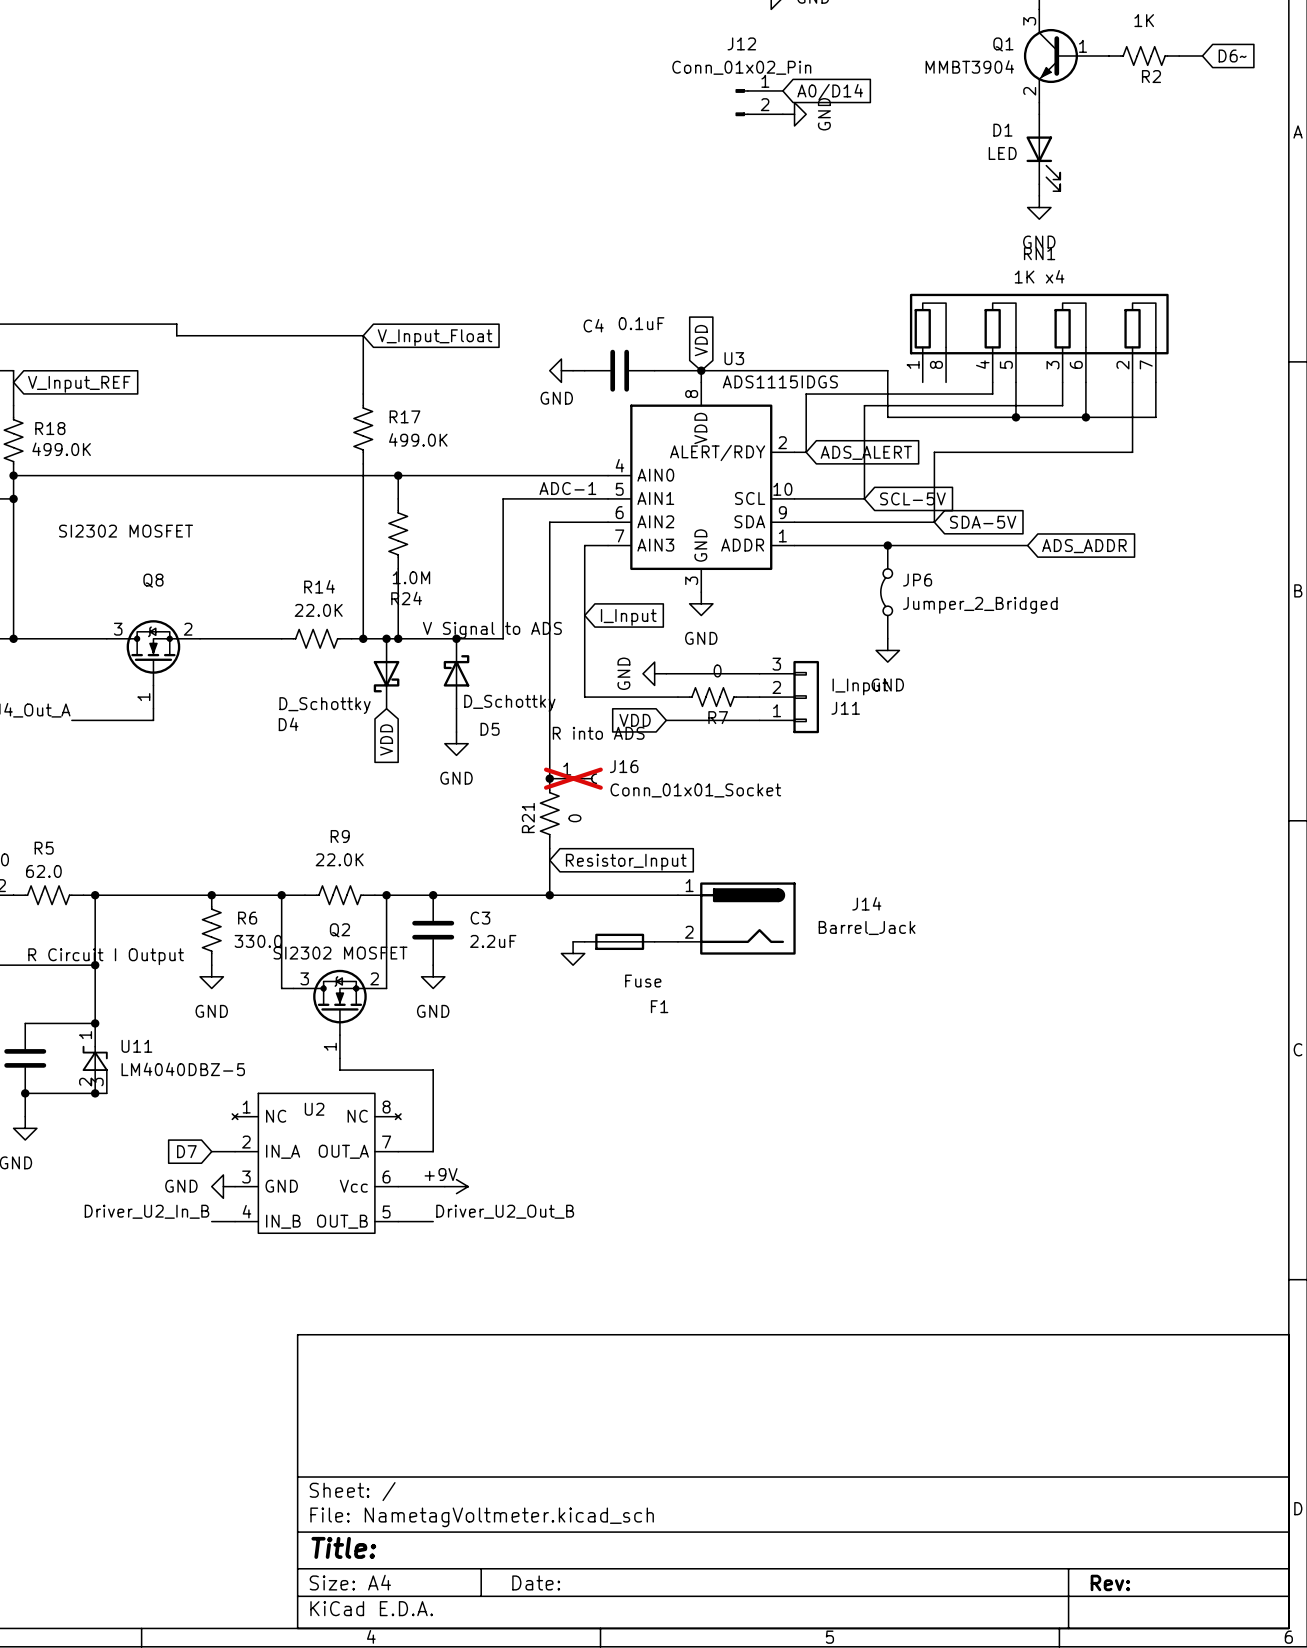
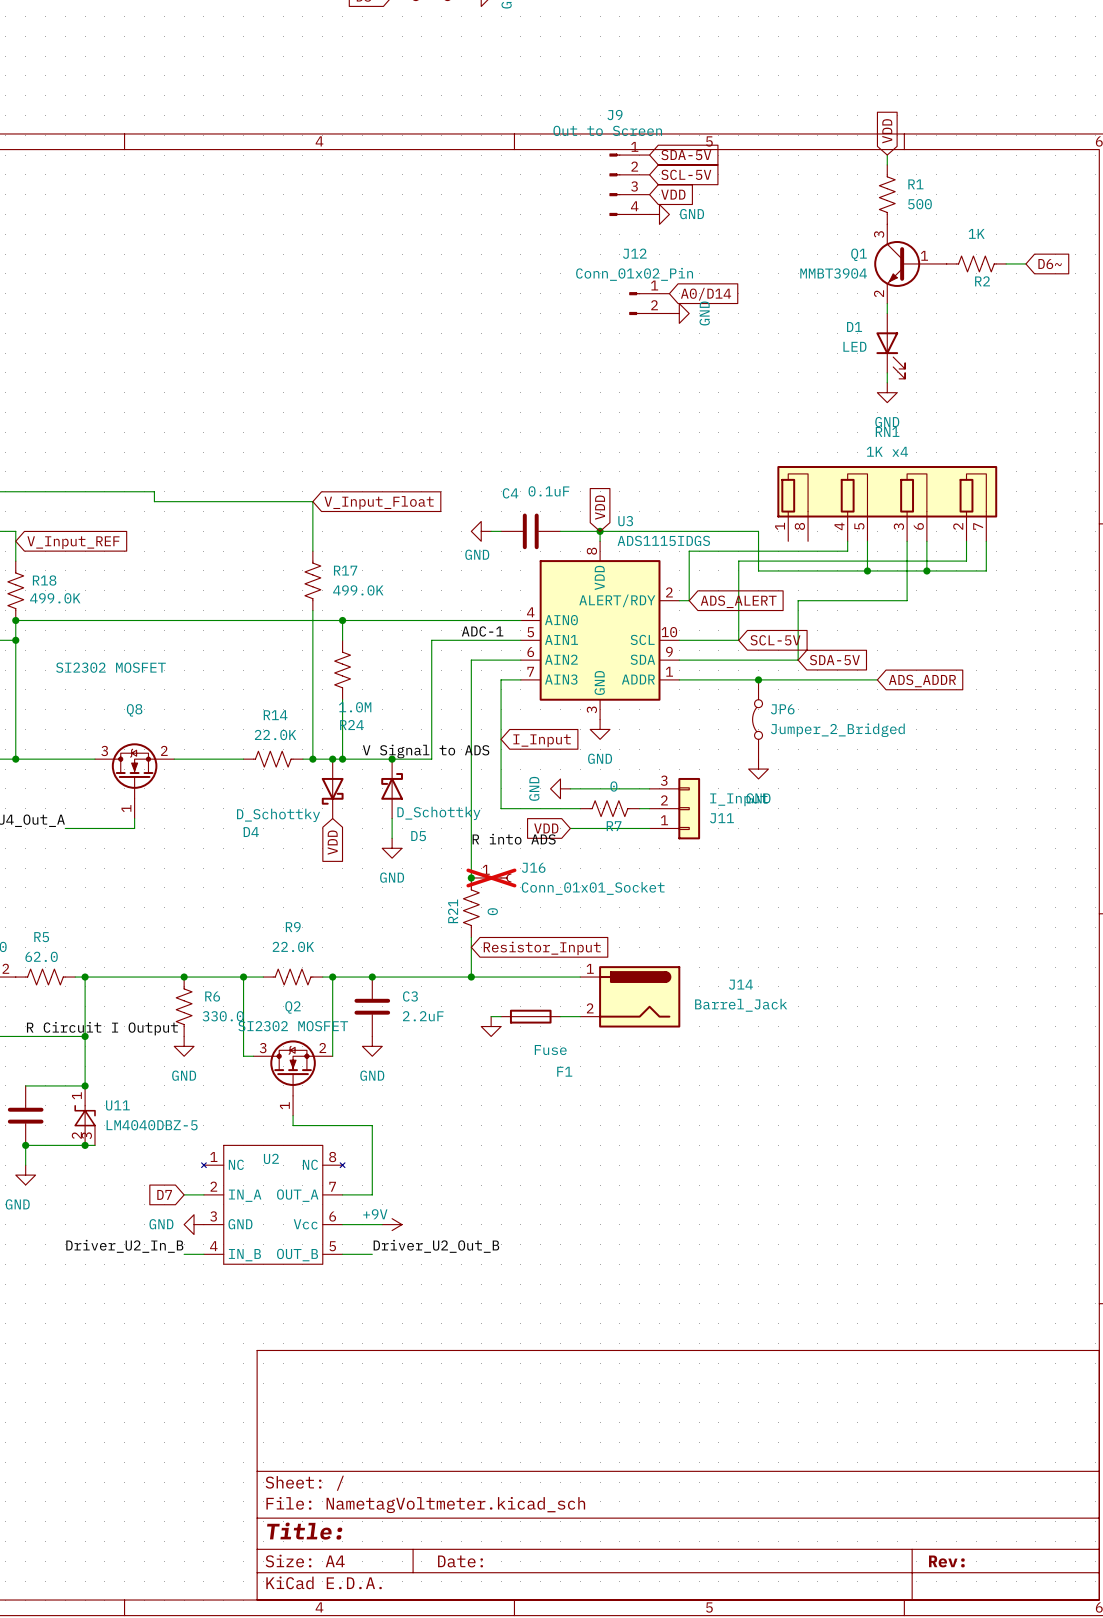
wire: (1132, 405) (1132, 452) (1062, 452) -> (966, 561) (907, 561) (907, 600)

